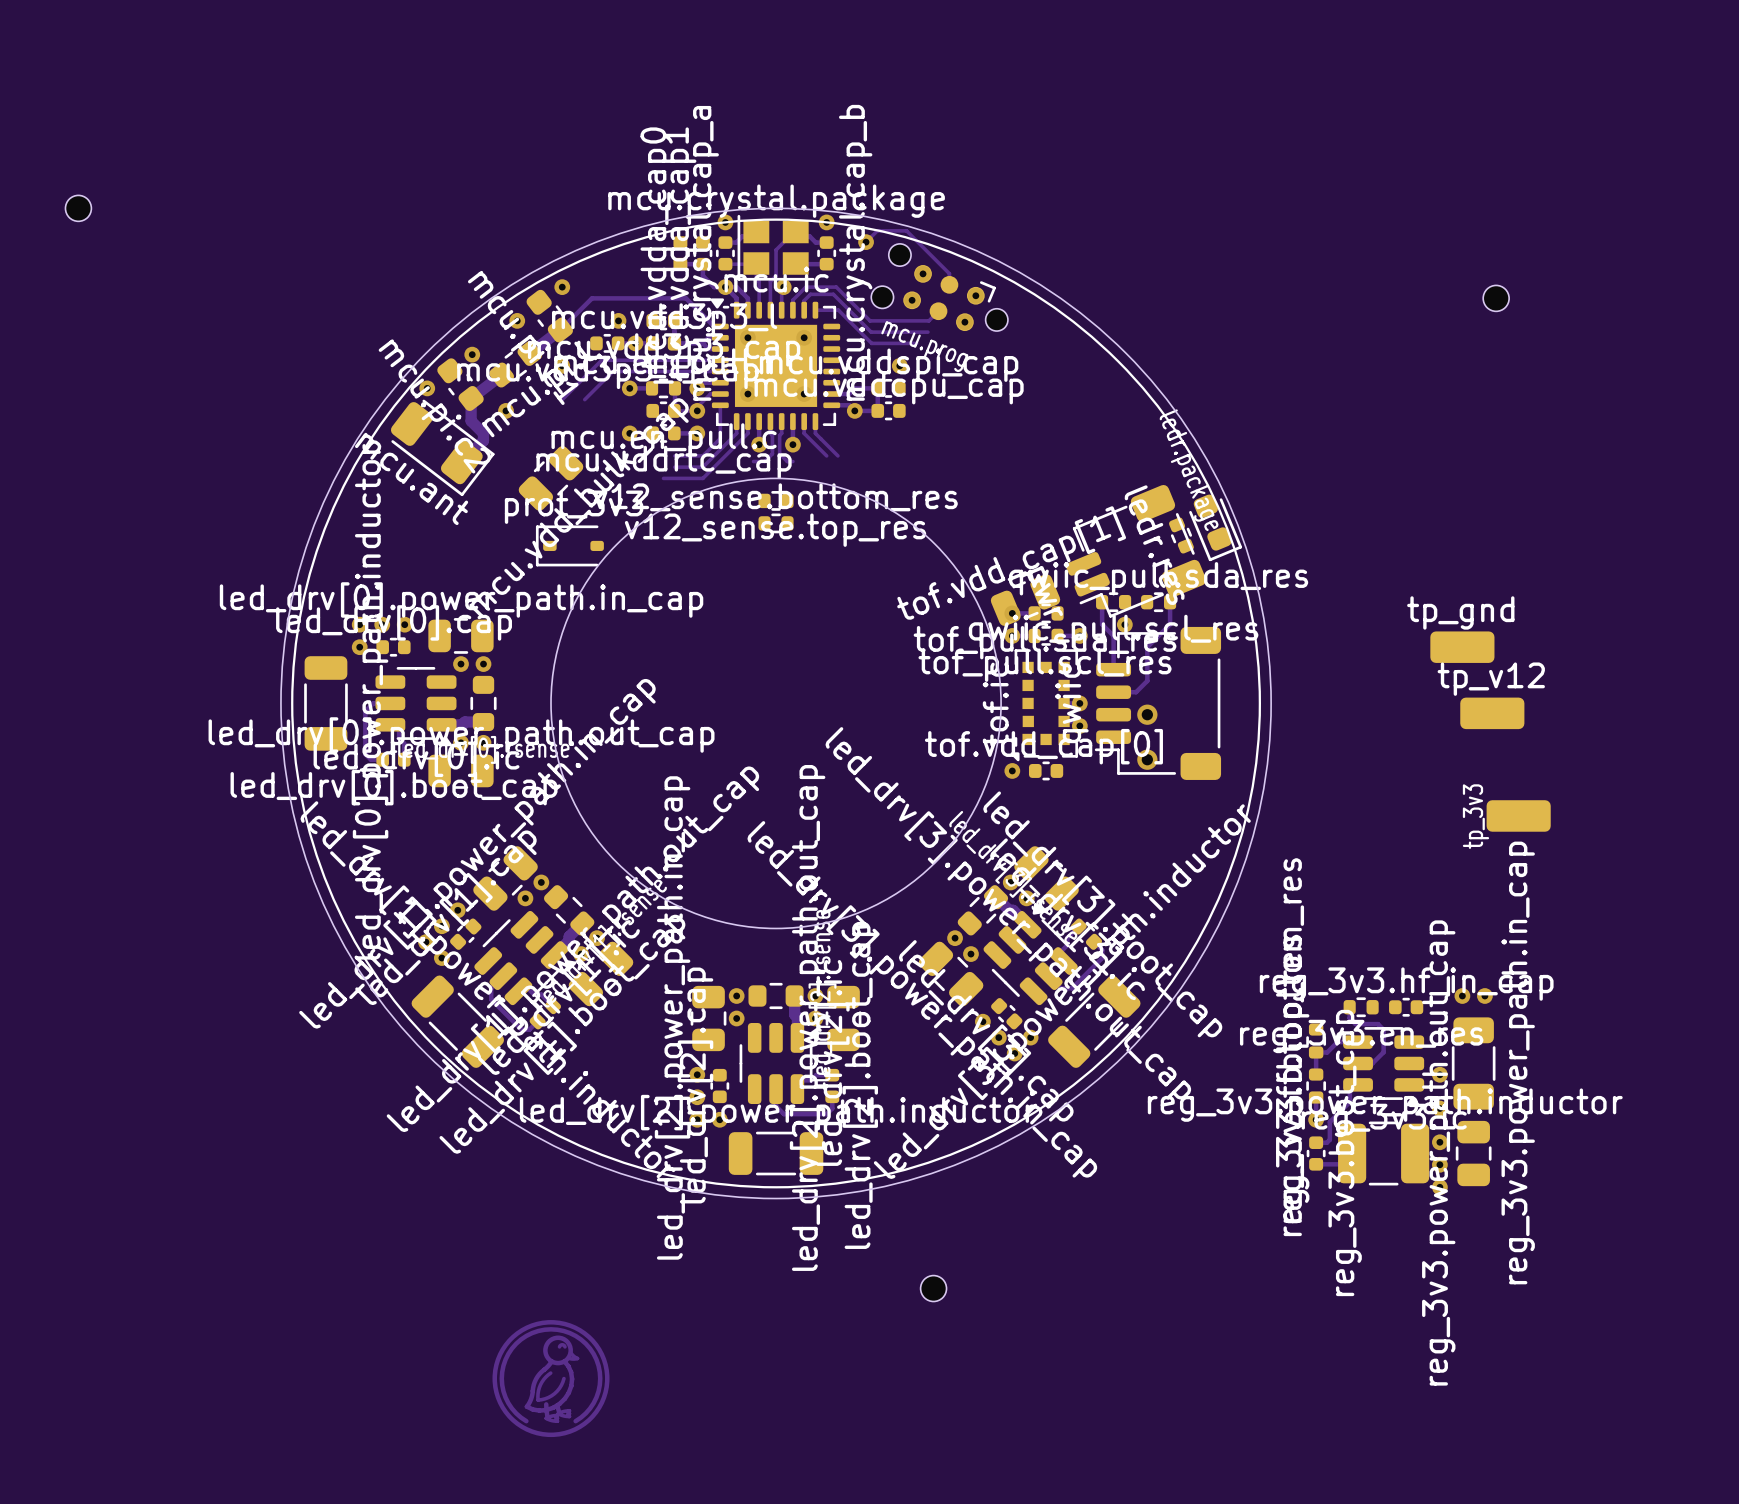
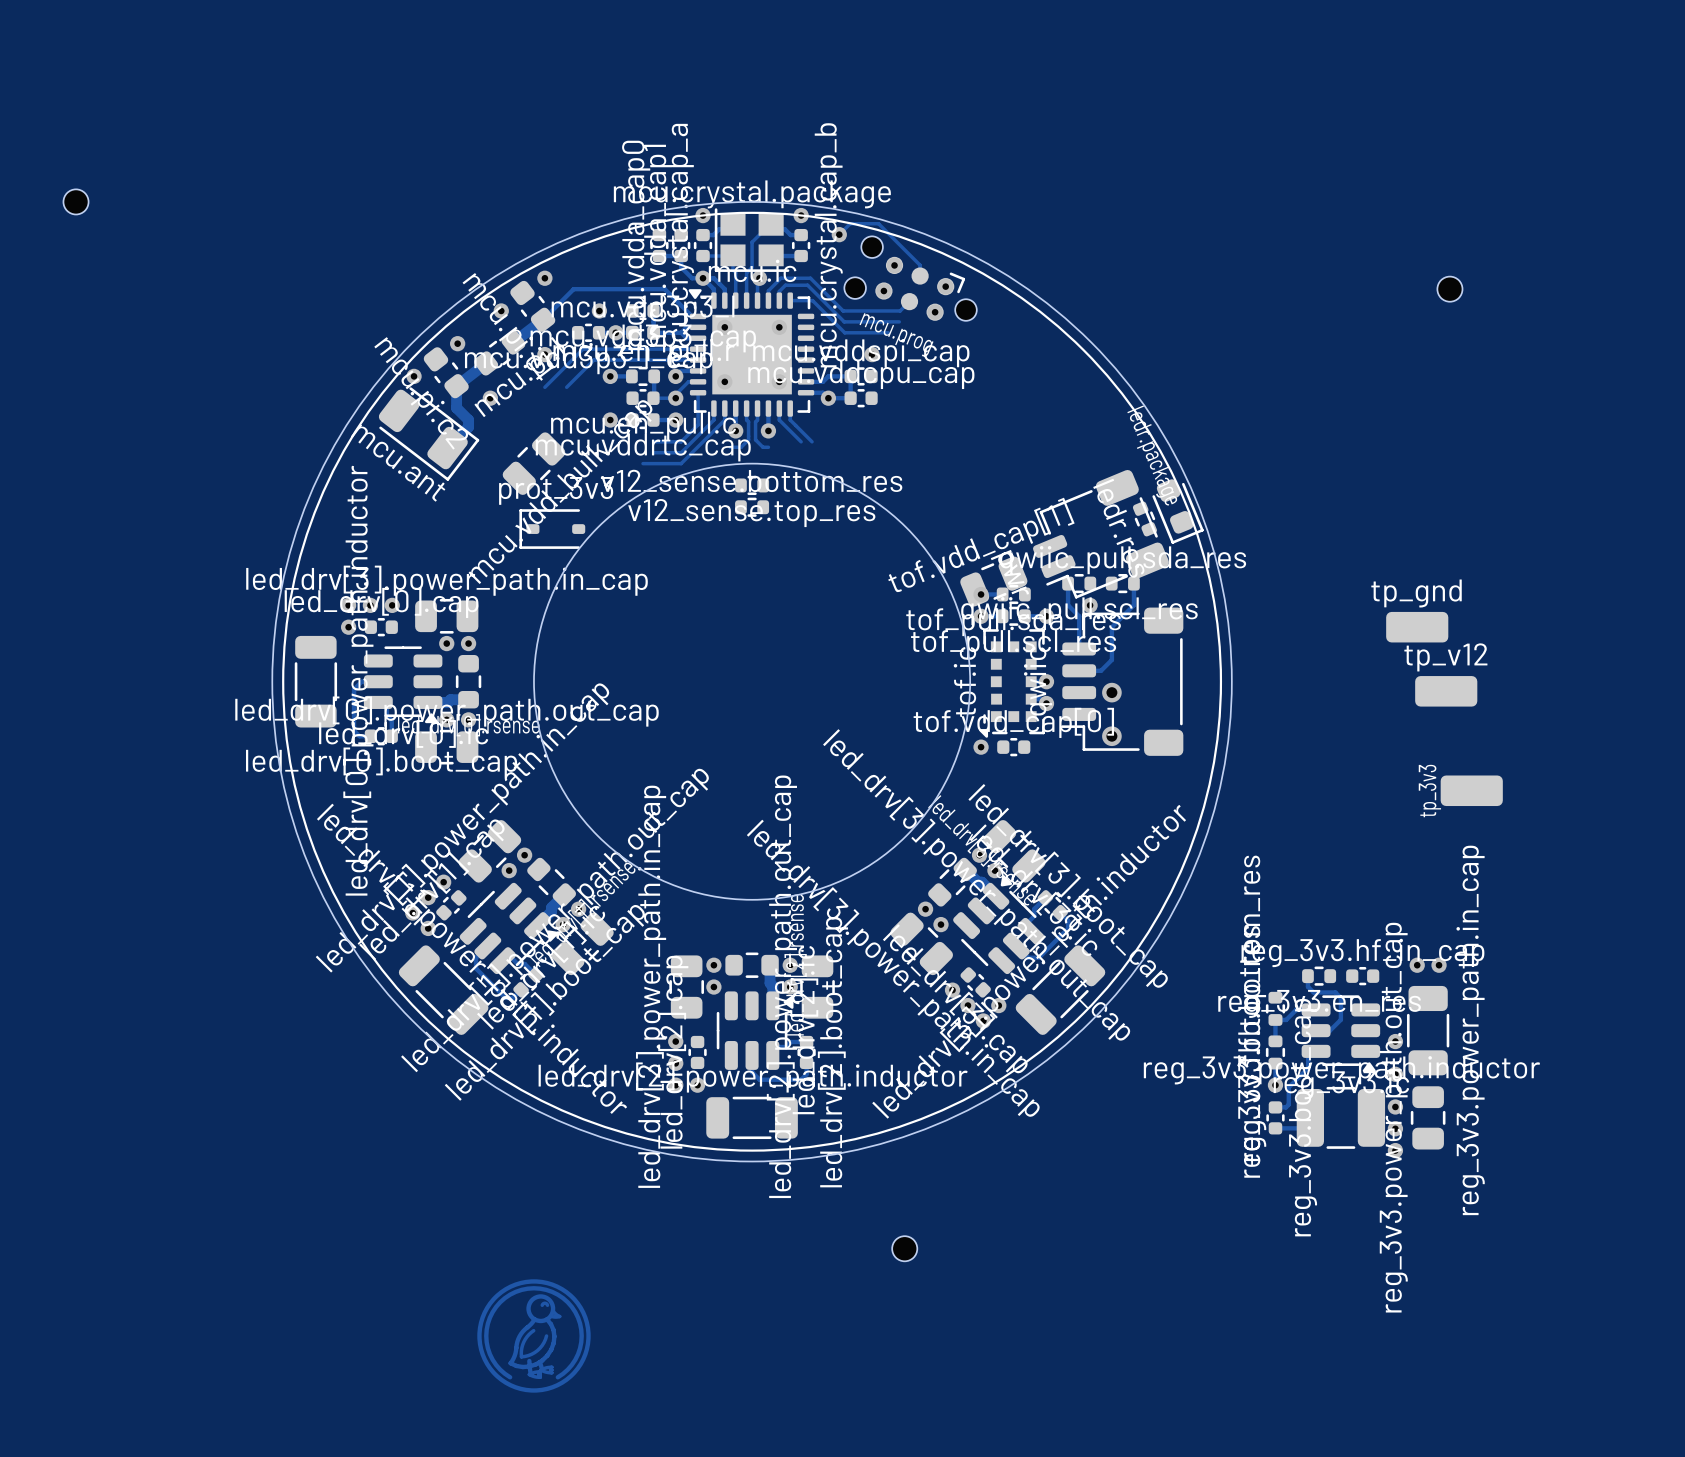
led_drv[0].power_path.in_cap name: led_drv[0].power_path.in_cap (461, 599) -> led_drv[3].power_path.in_cap (447, 580)

